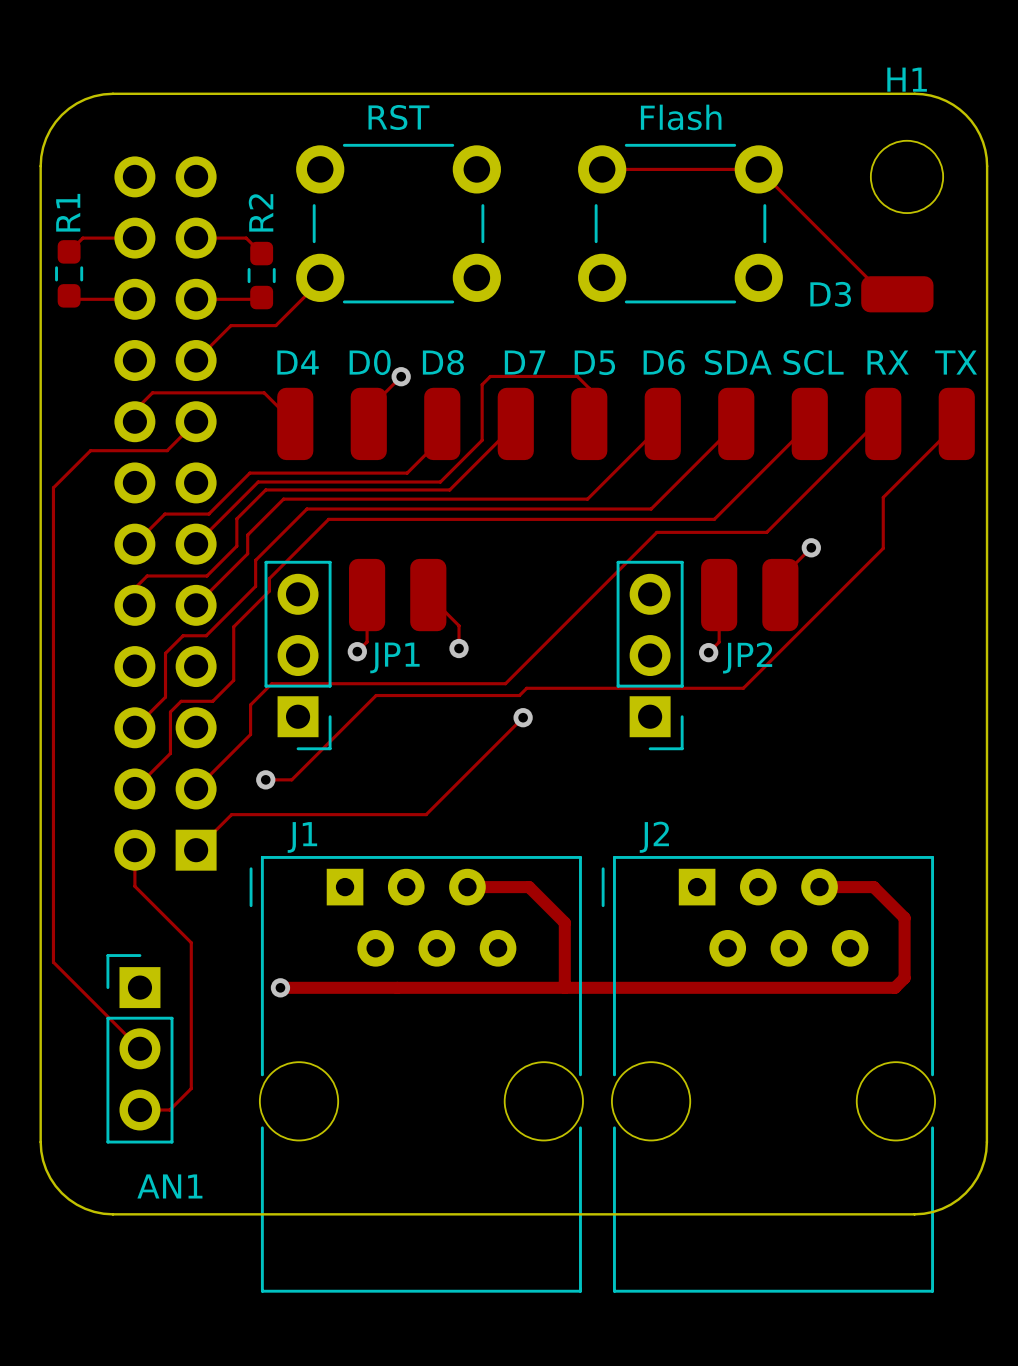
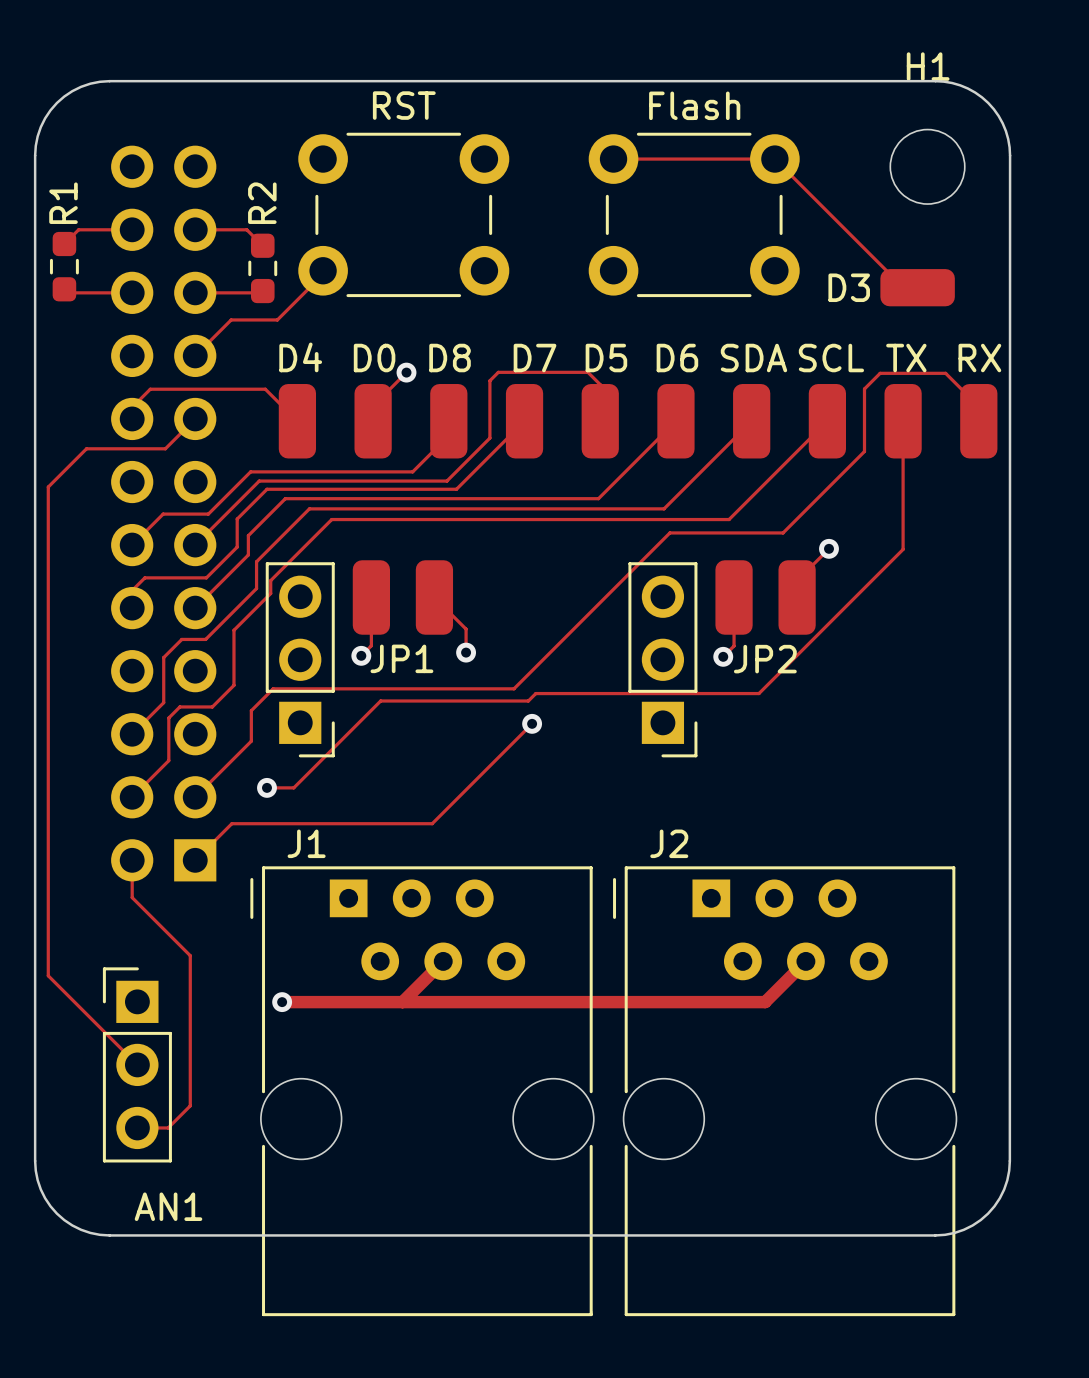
part value: RX (888, 362) -> TX (906, 358)
part value: TX (956, 362) -> RX (979, 358)
track: (883, 423) (875, 423) (845, 453) -> (903, 421) (903, 496)
track: (956, 423) (883, 497) -> (978, 421) (978, 406) (945, 373) (880, 373) (864, 388) (864, 451)
track: (467, 887) (529, 887) (564, 922) (564, 987) -> none
track: (819, 887) (873, 887) (904, 917) (904, 978) (894, 987) (749, 987) -> (805, 961) (765, 1002)
track: none -> (443, 961) (402, 1002)

